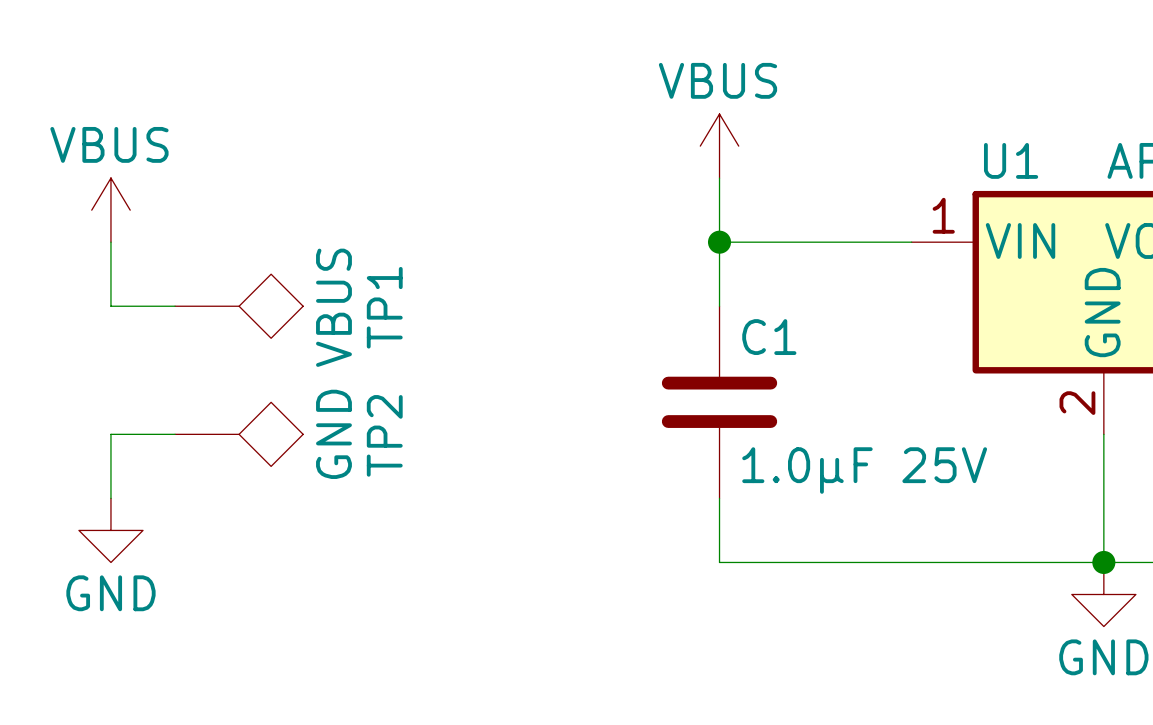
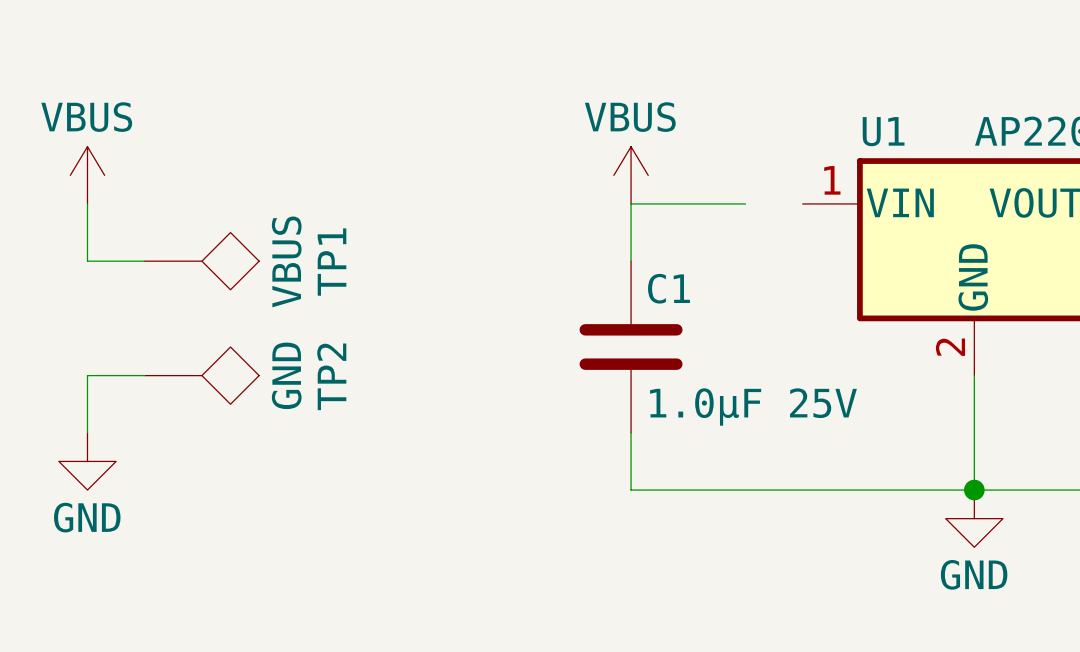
power symbol position: VBUS (719, 146) -> VBUS (631, 175)
junction: (719, 242) -> none
wire: (847, 242) (911, 242) -> none

